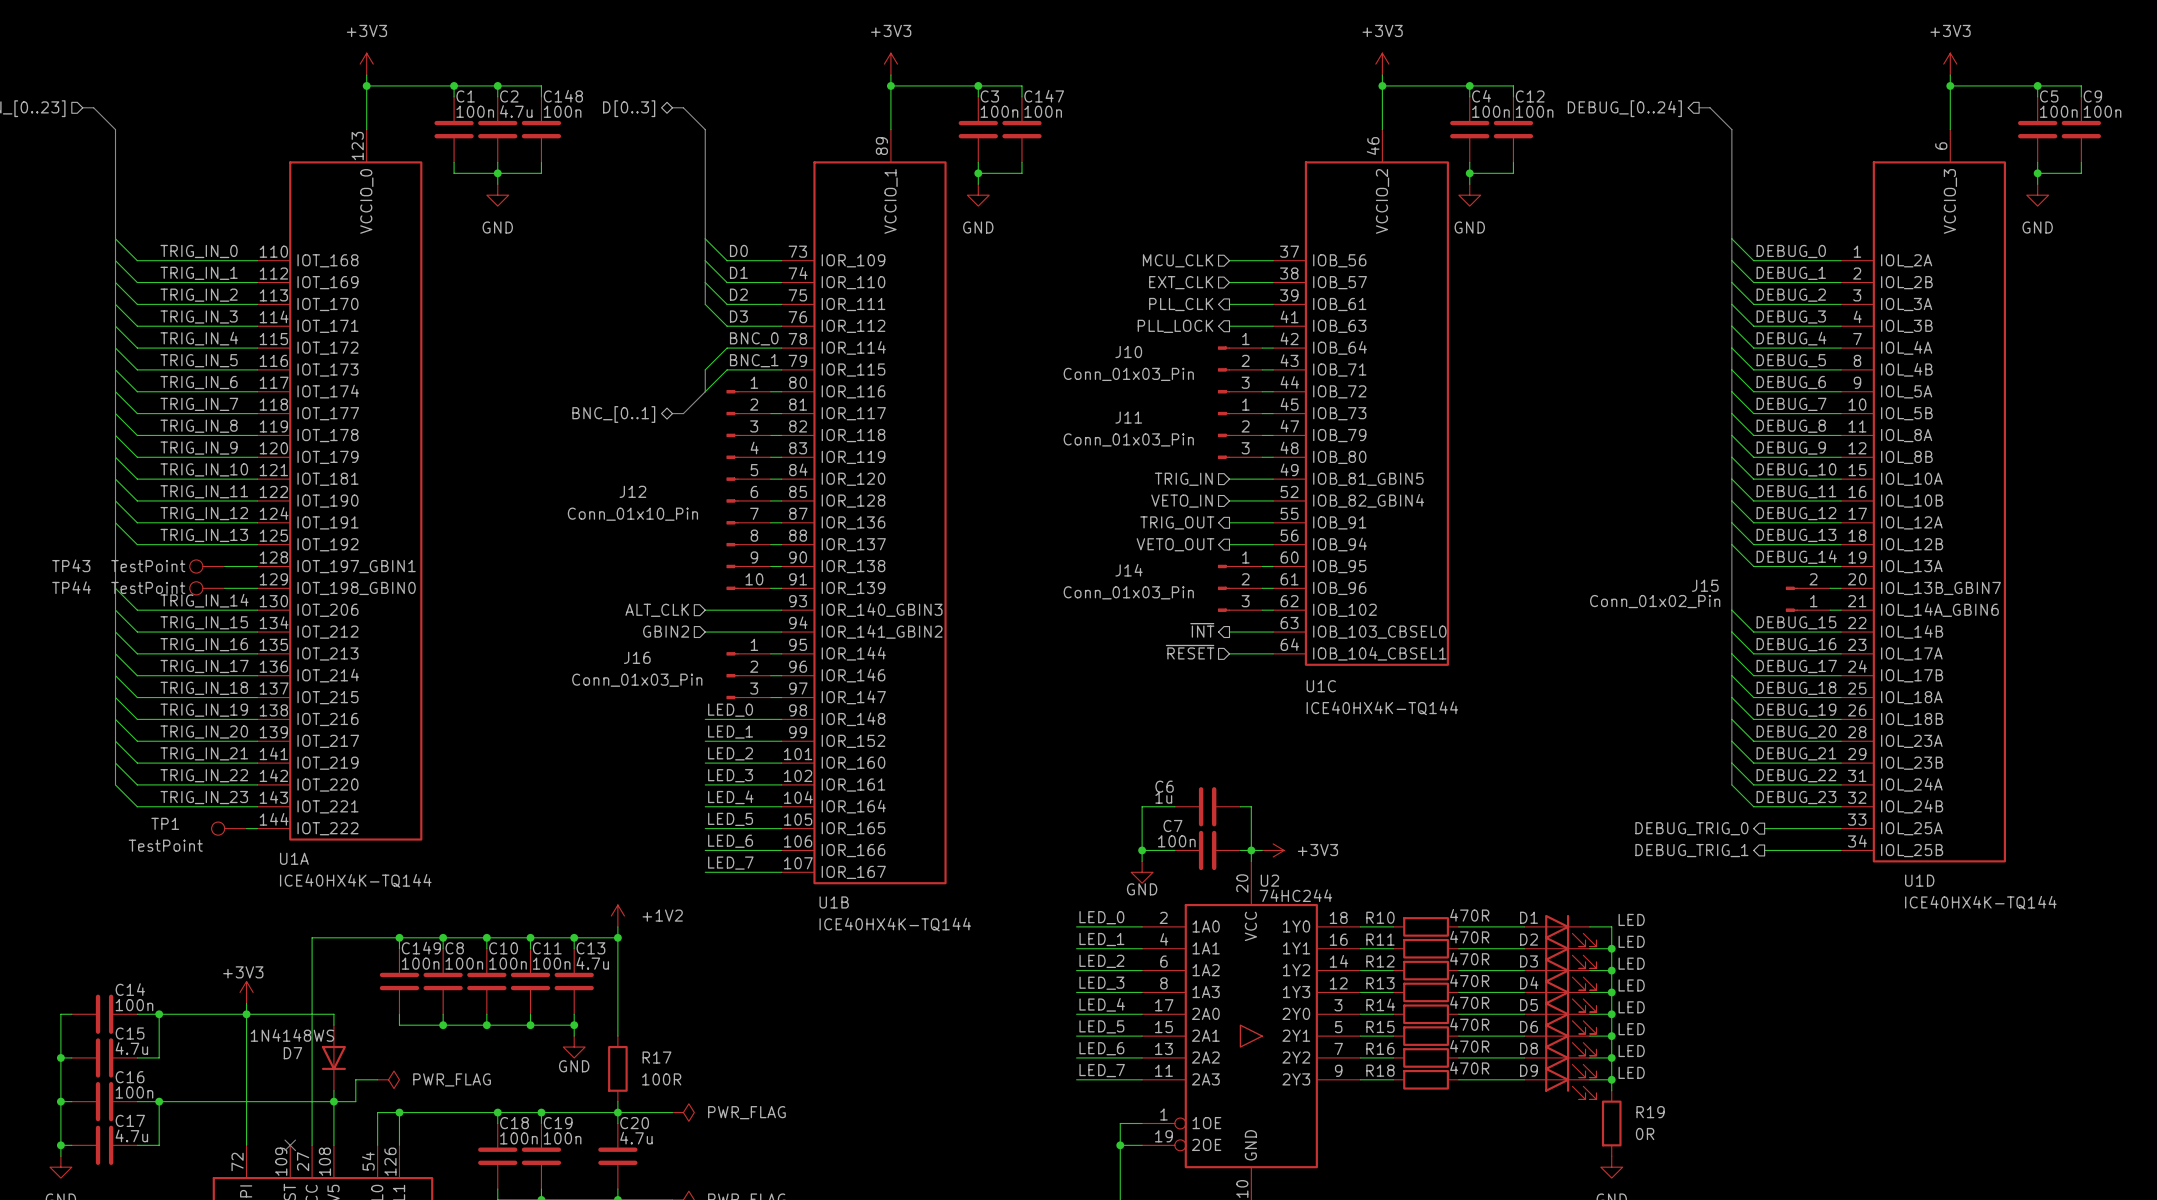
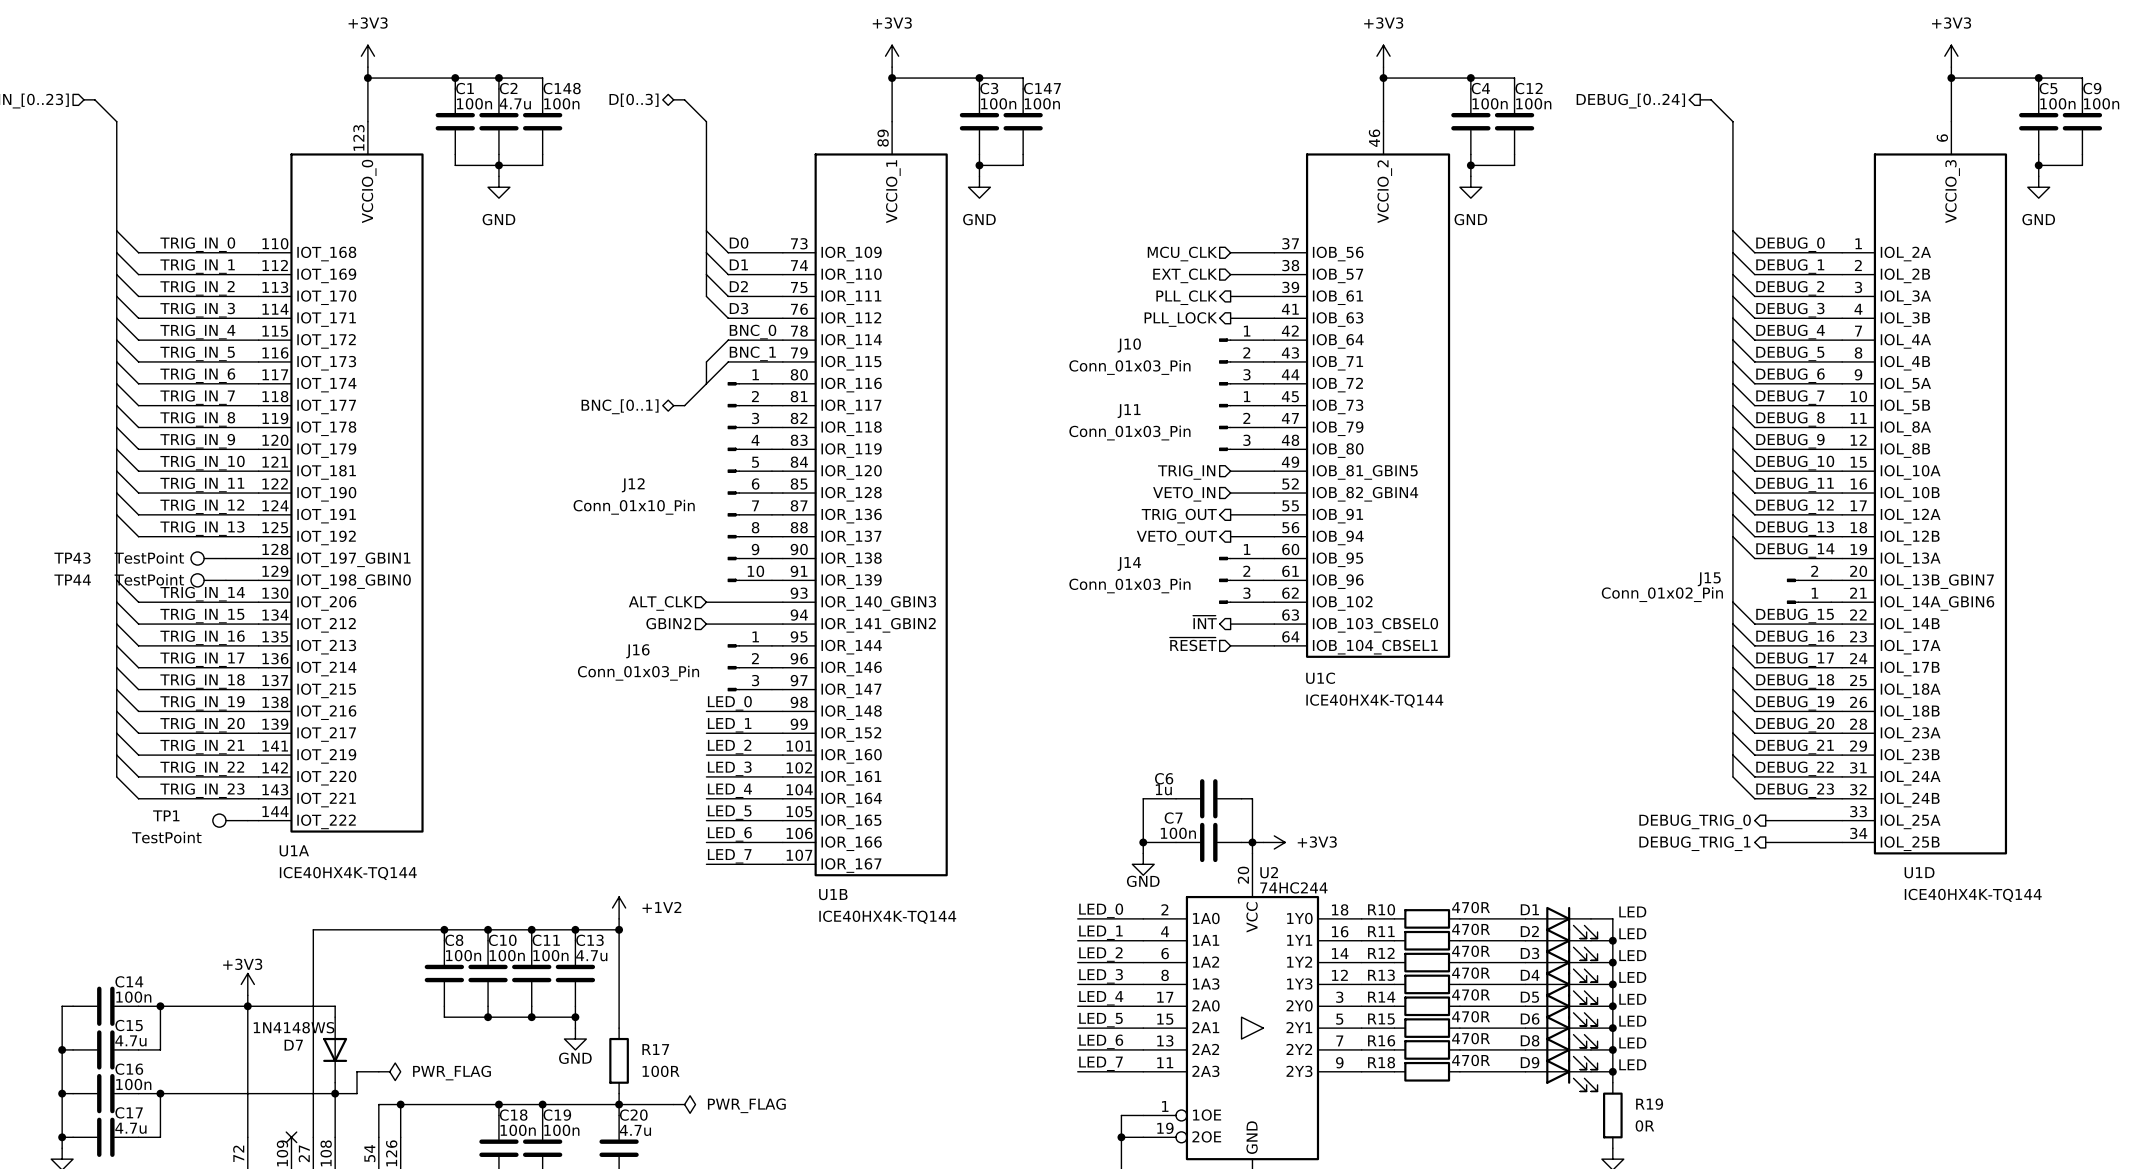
wire: (399, 937) (399, 948) -> none
junction: (399, 937) -> none
C149: 100n (399, 981) -> none
wire: (399, 1014) (399, 1025) (443, 1025) -> none
junction: (443, 1025) -> none

